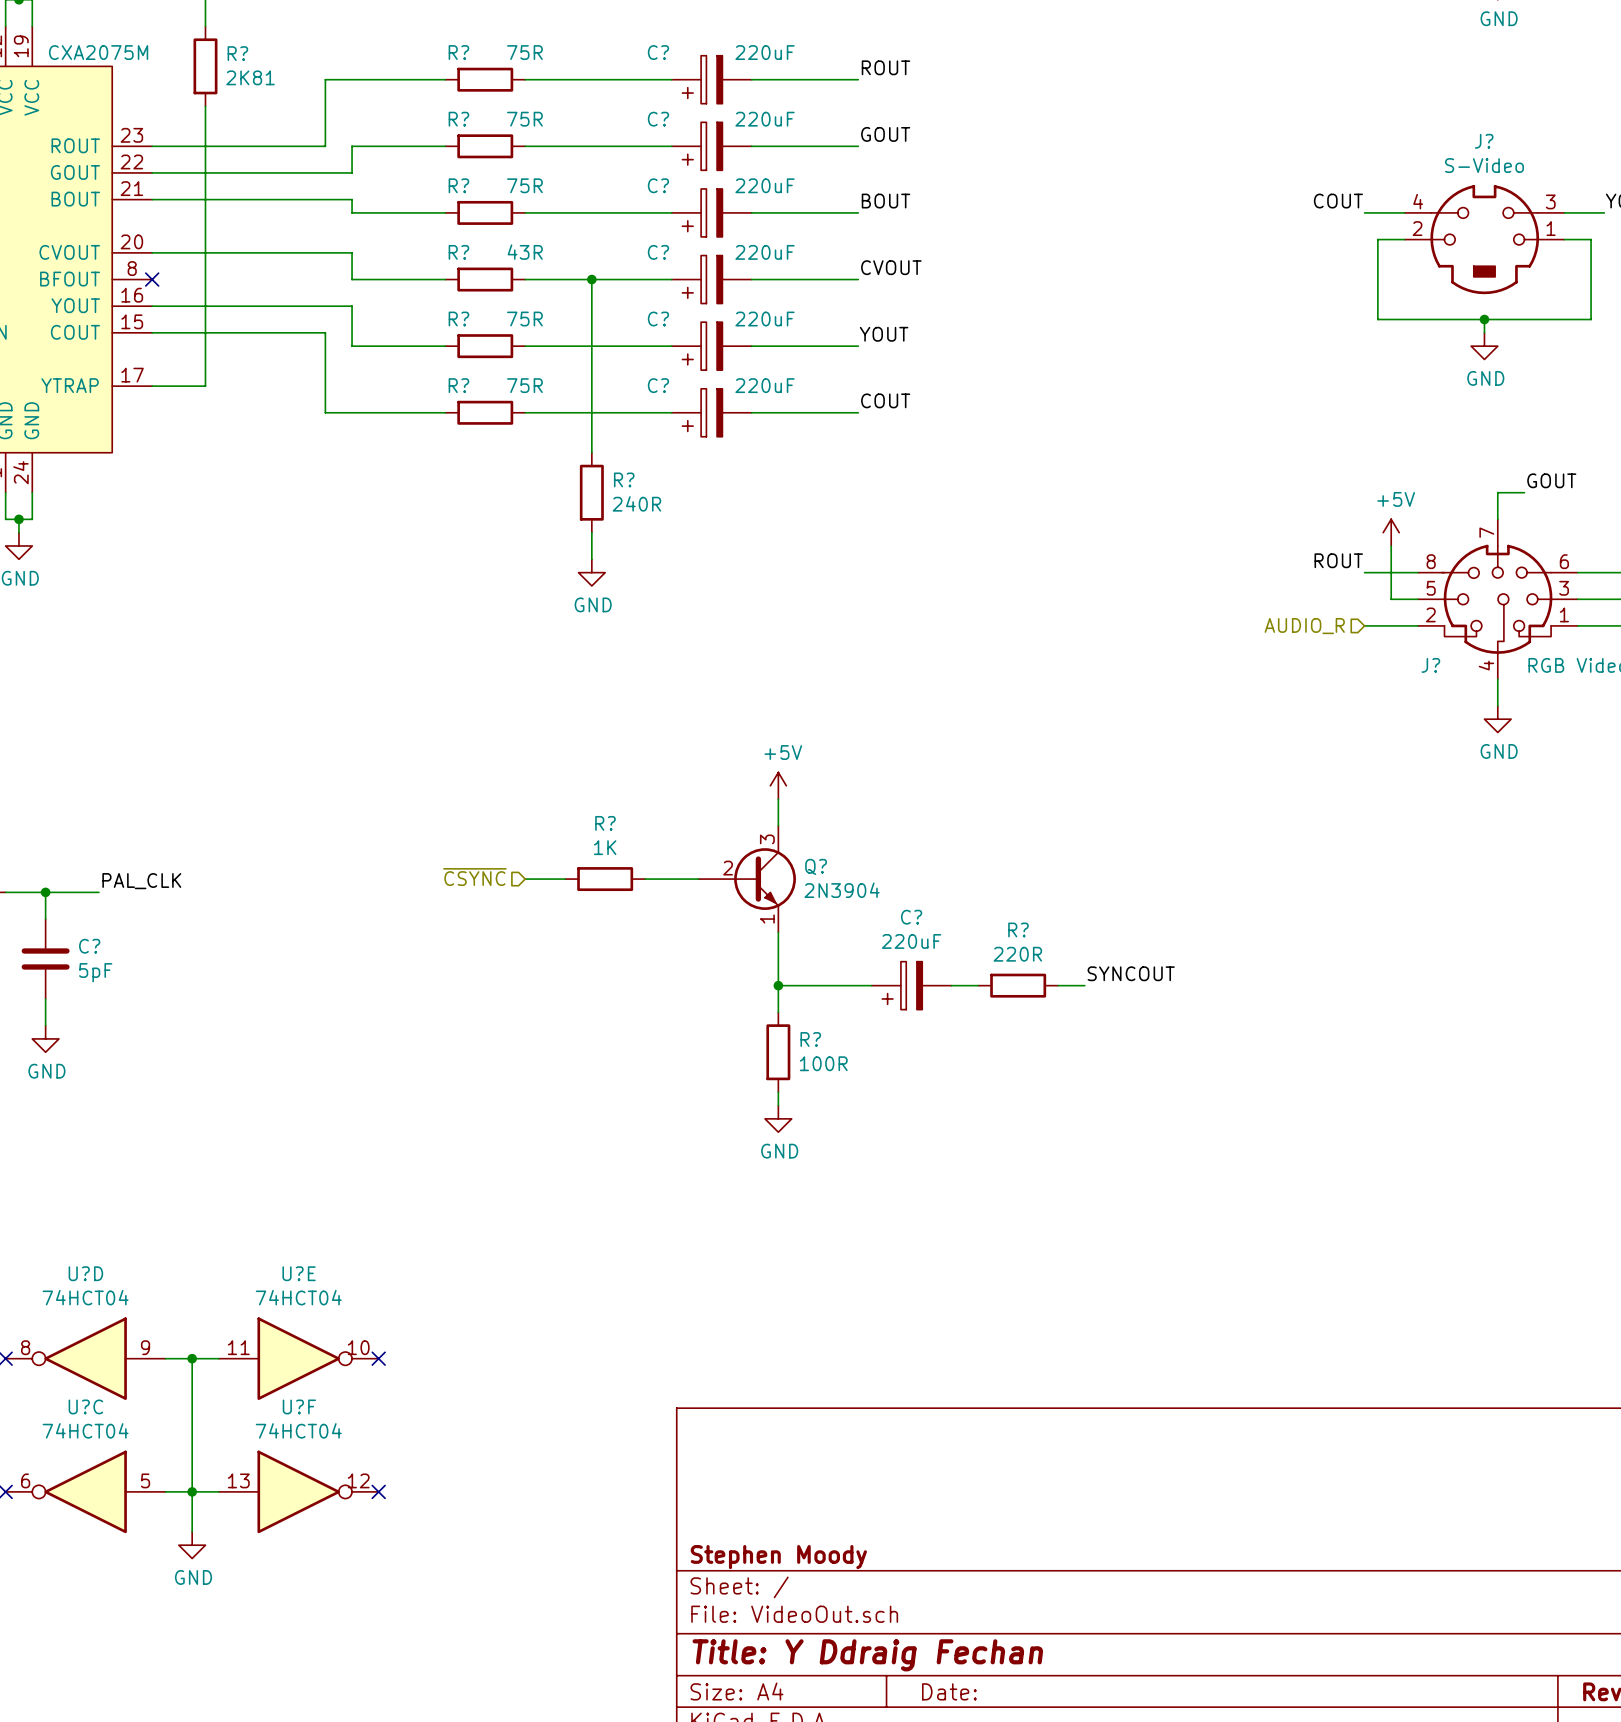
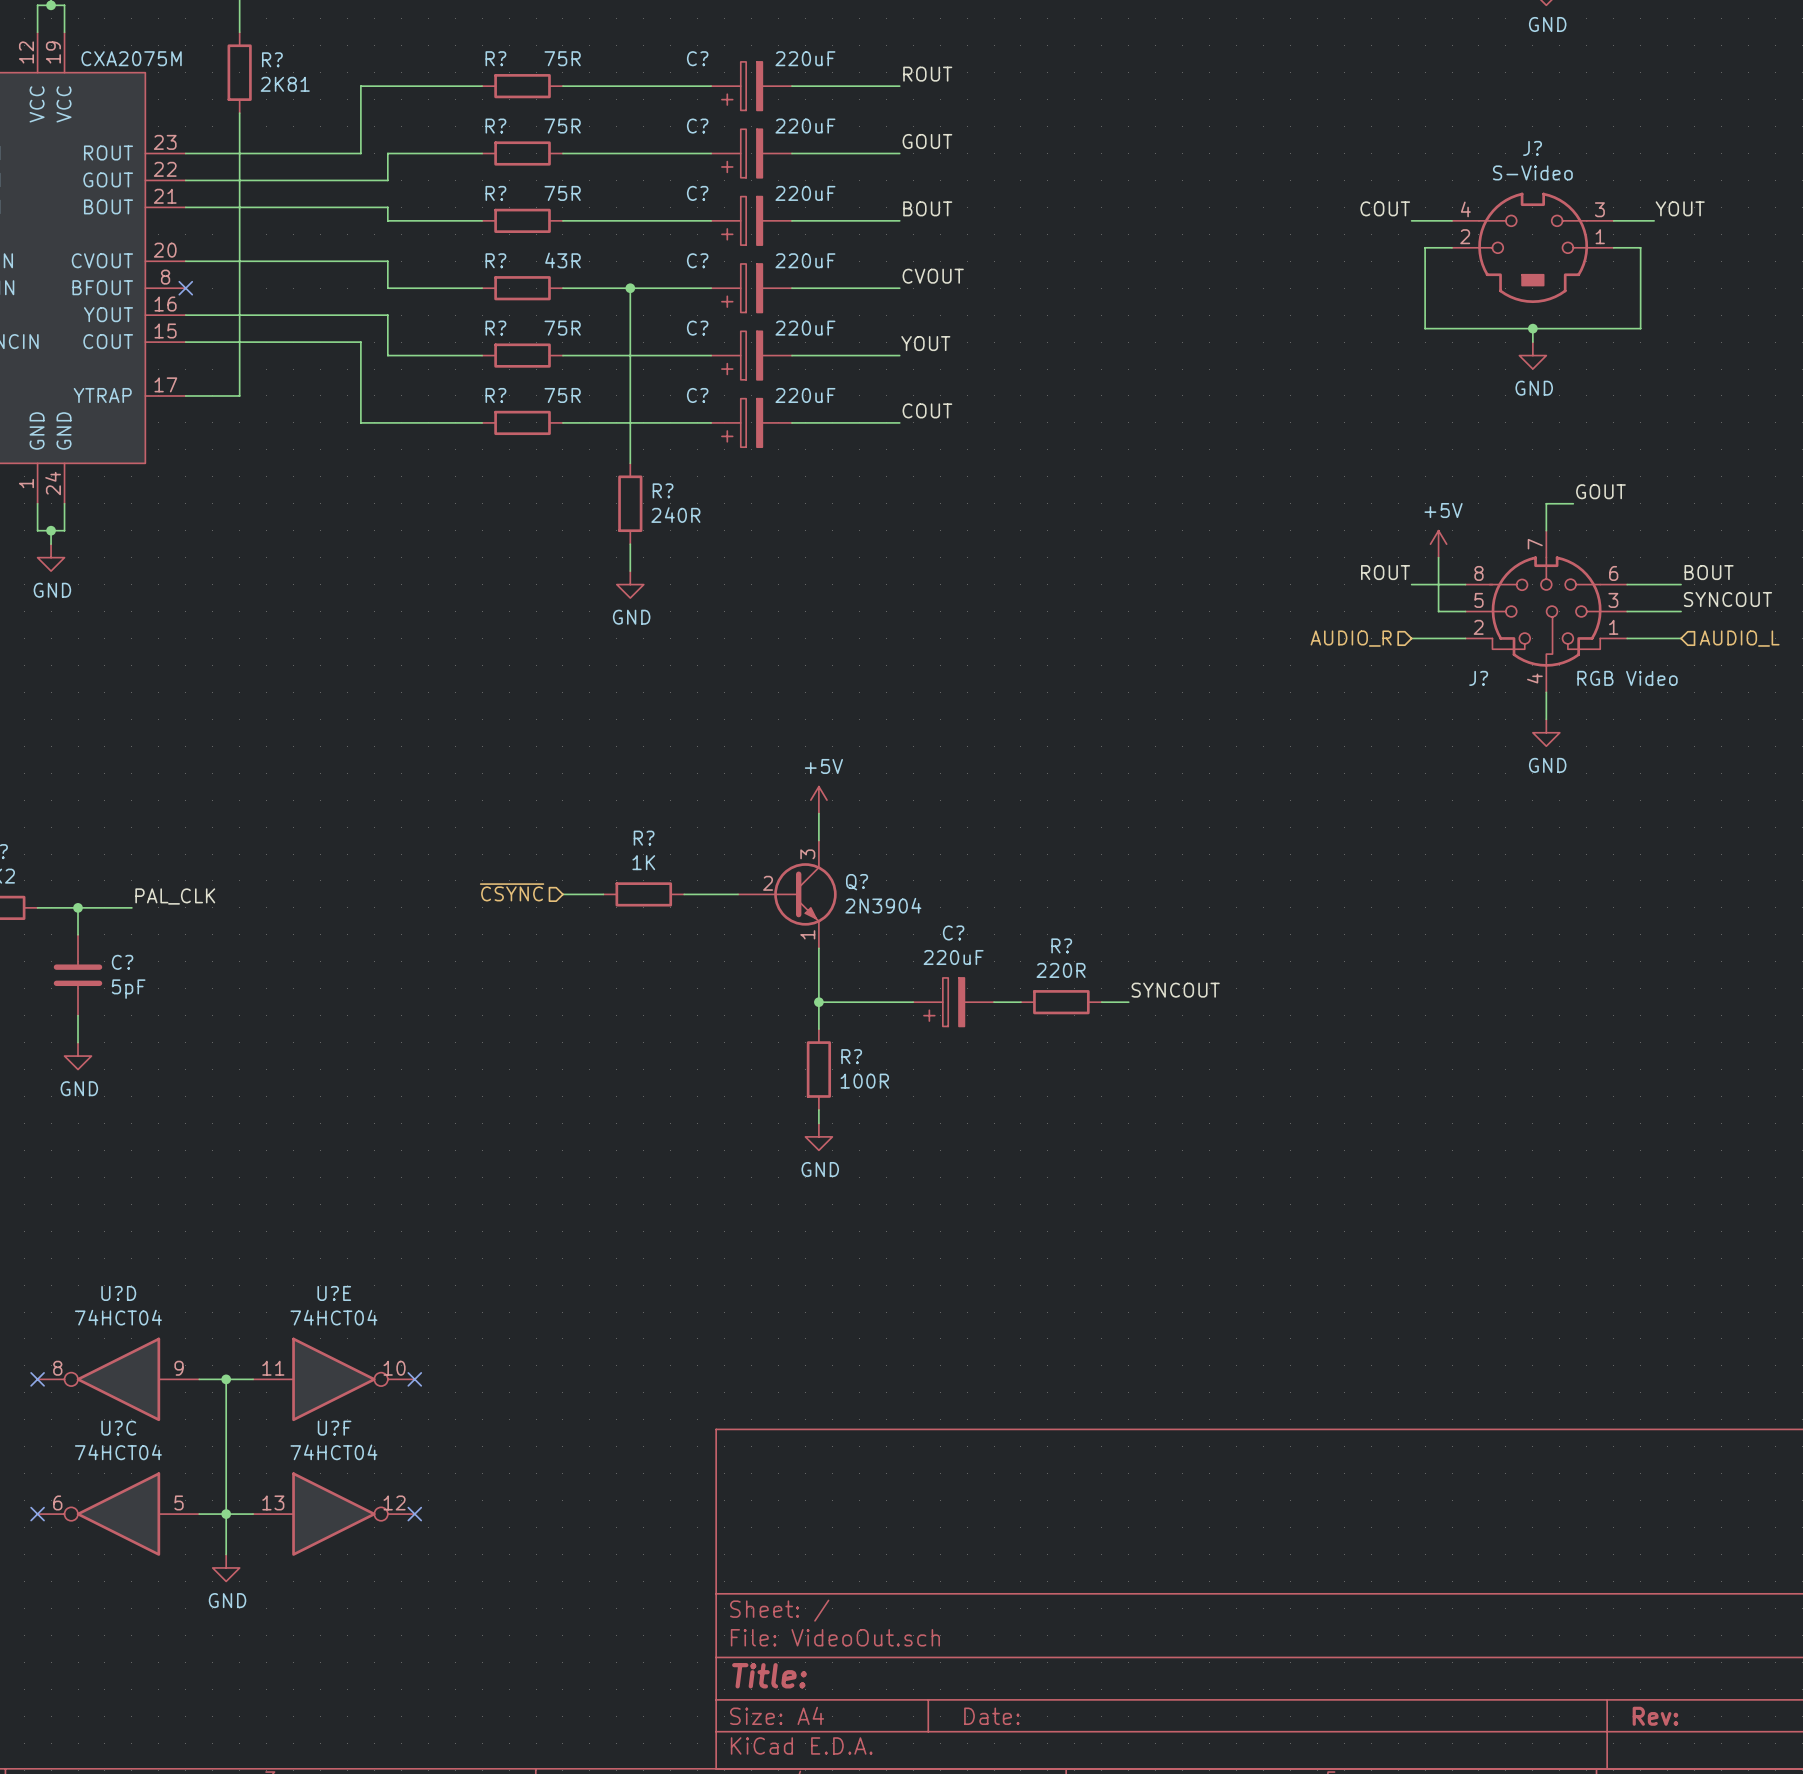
title block: Stephen Moody (778, 1557) -> none
title block: Title: Y Ddraig Fechan (867, 1655) -> Title: (769, 1675)

